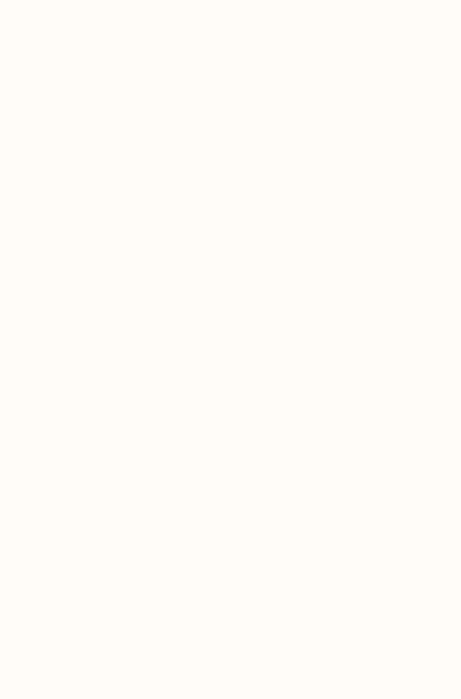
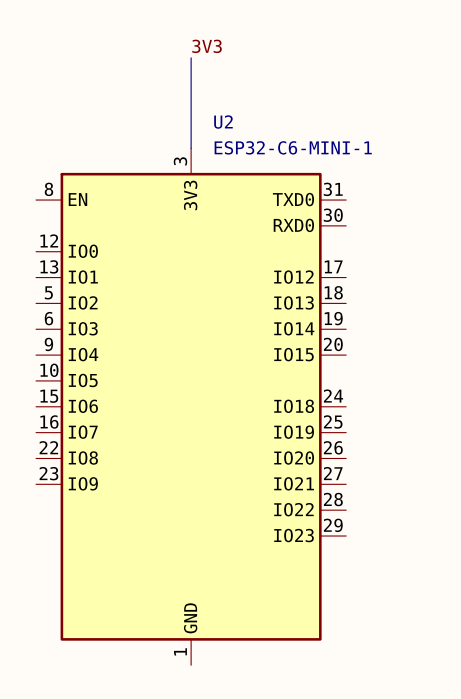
label: none -> 3V3 (207, 46)
wire: none -> (191, 57) (191, 148)
U2: none -> ESP32-C6-MINI-1 (191, 406)

